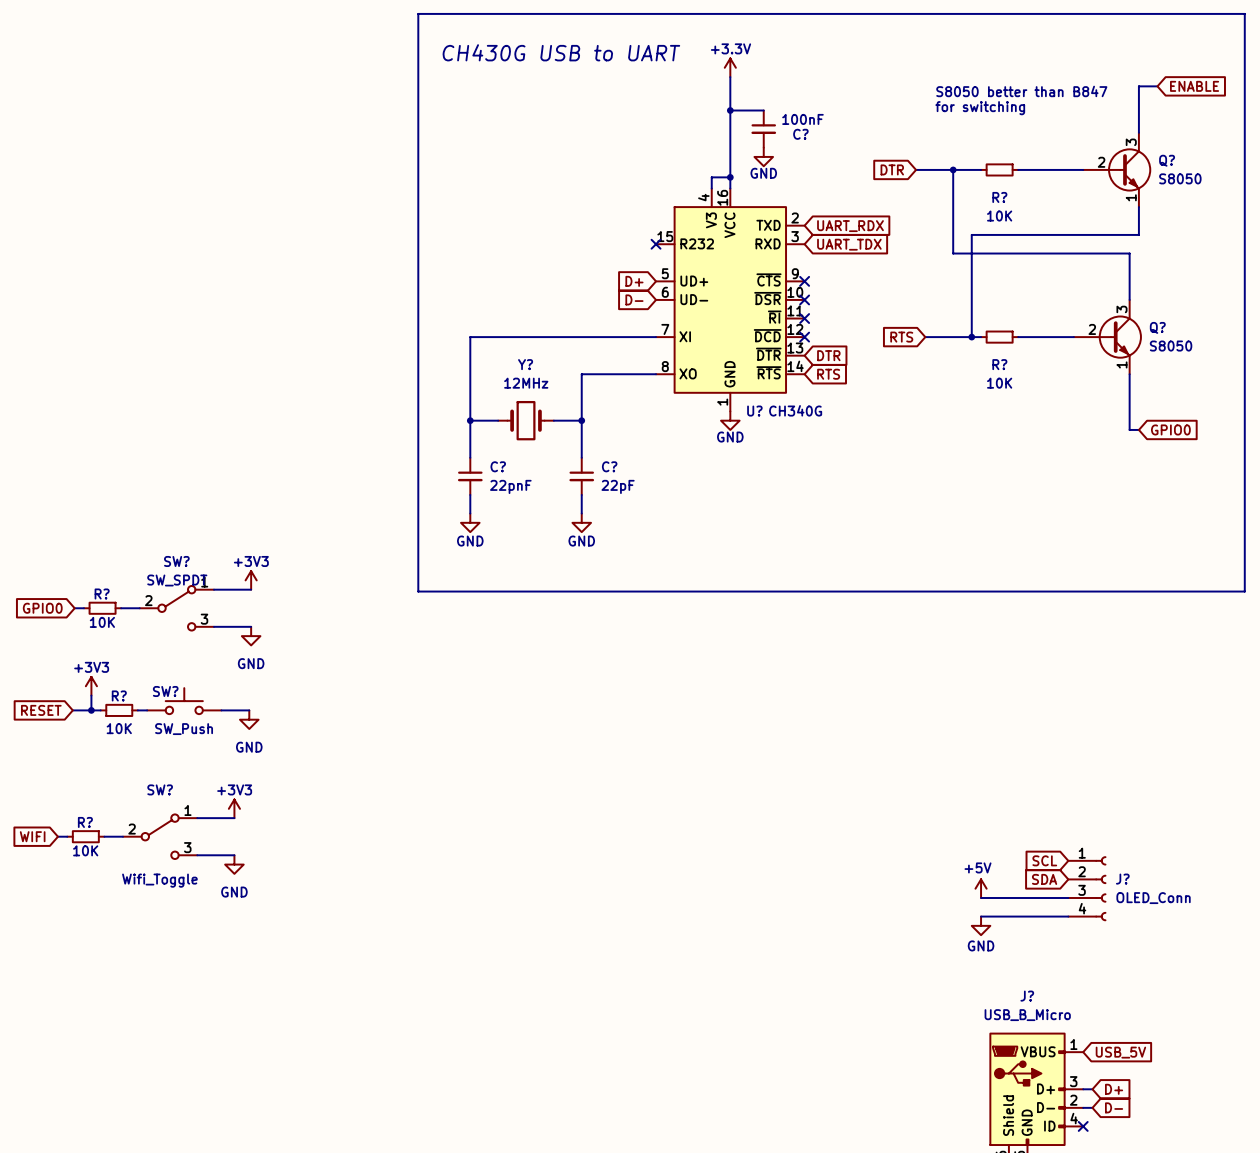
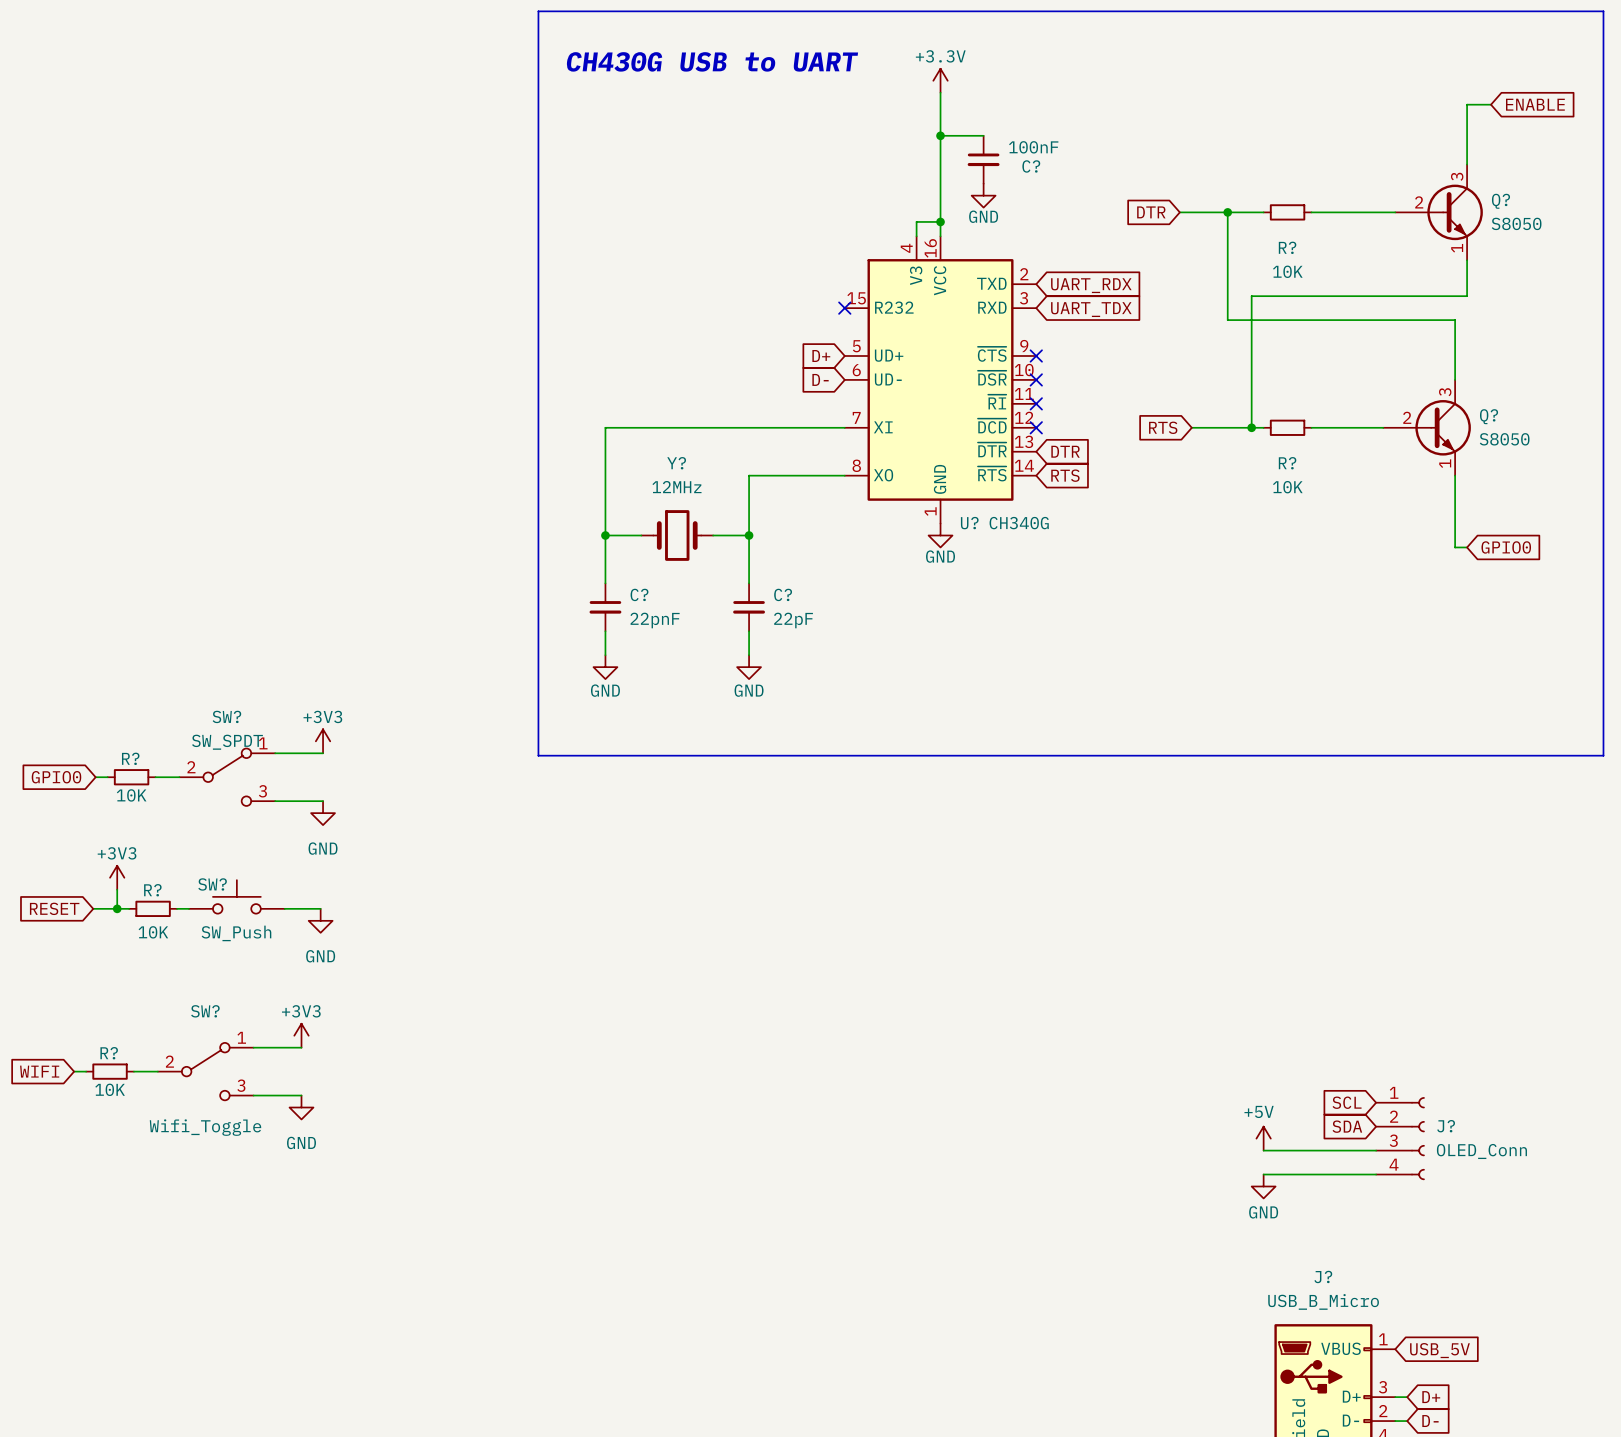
text: S8050 better than B847 (1021, 91) -> none
text: for switching (980, 108) -> none

